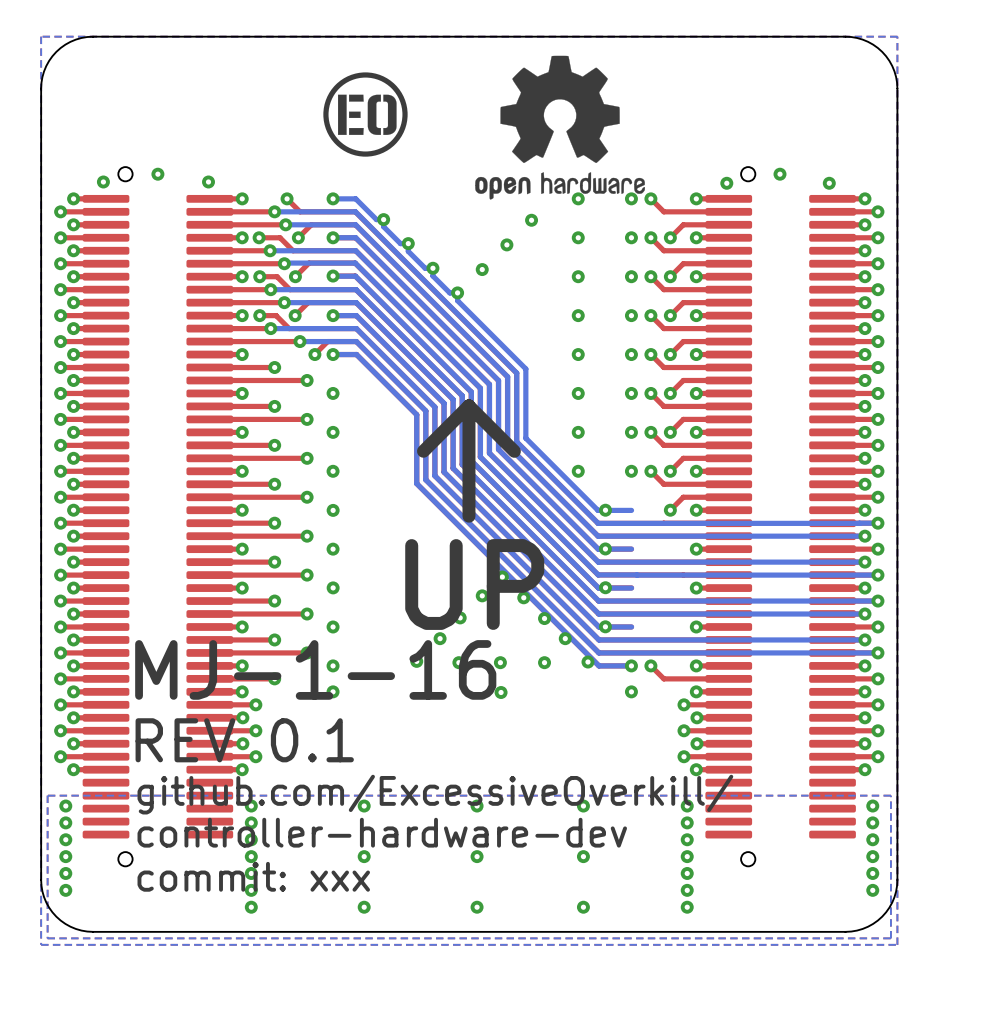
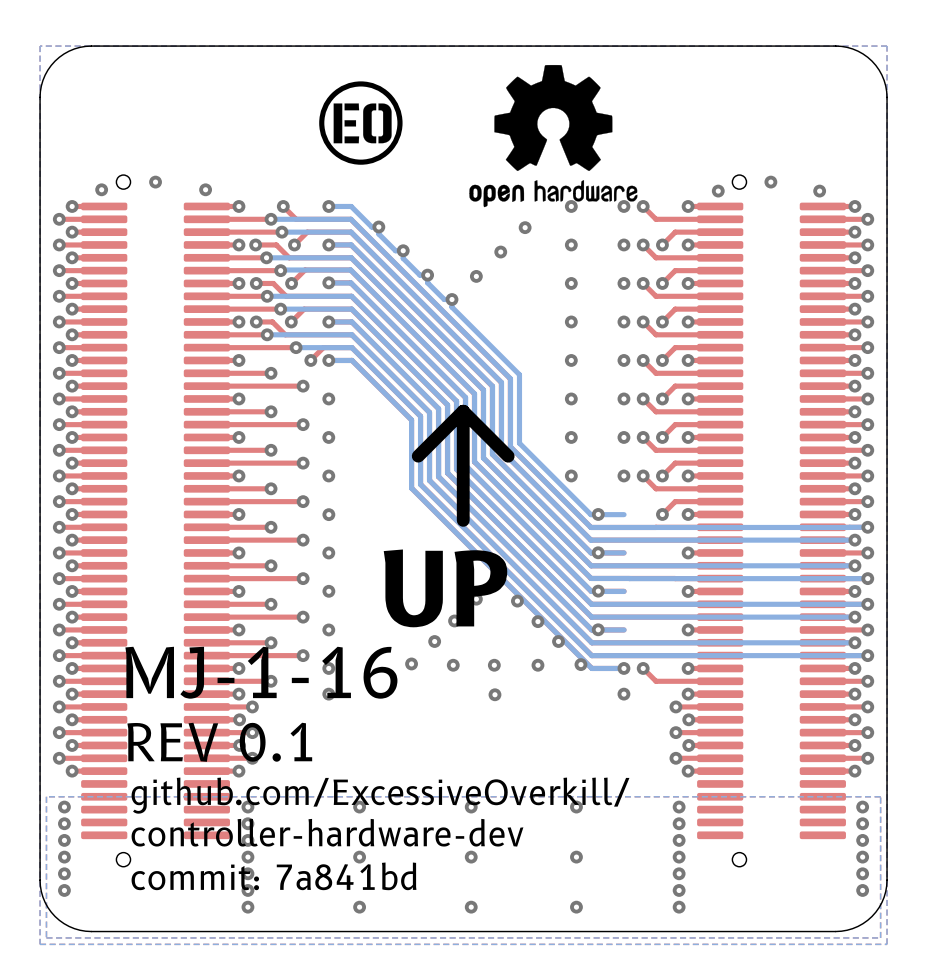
text: commit: xxx (253, 876) -> commit: 7a841bd (274, 876)

